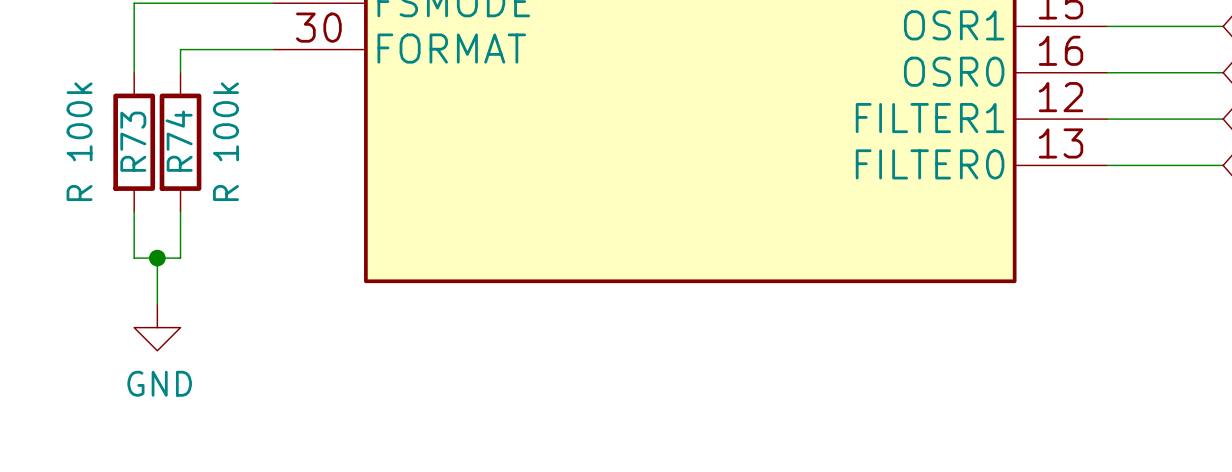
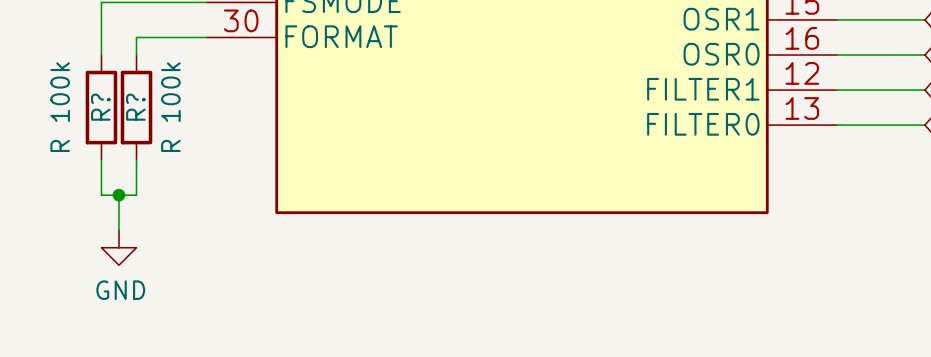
R73 name: R73 (133, 141) -> R? (100, 107)
R74 name: R74 (179, 141) -> R? (135, 107)

